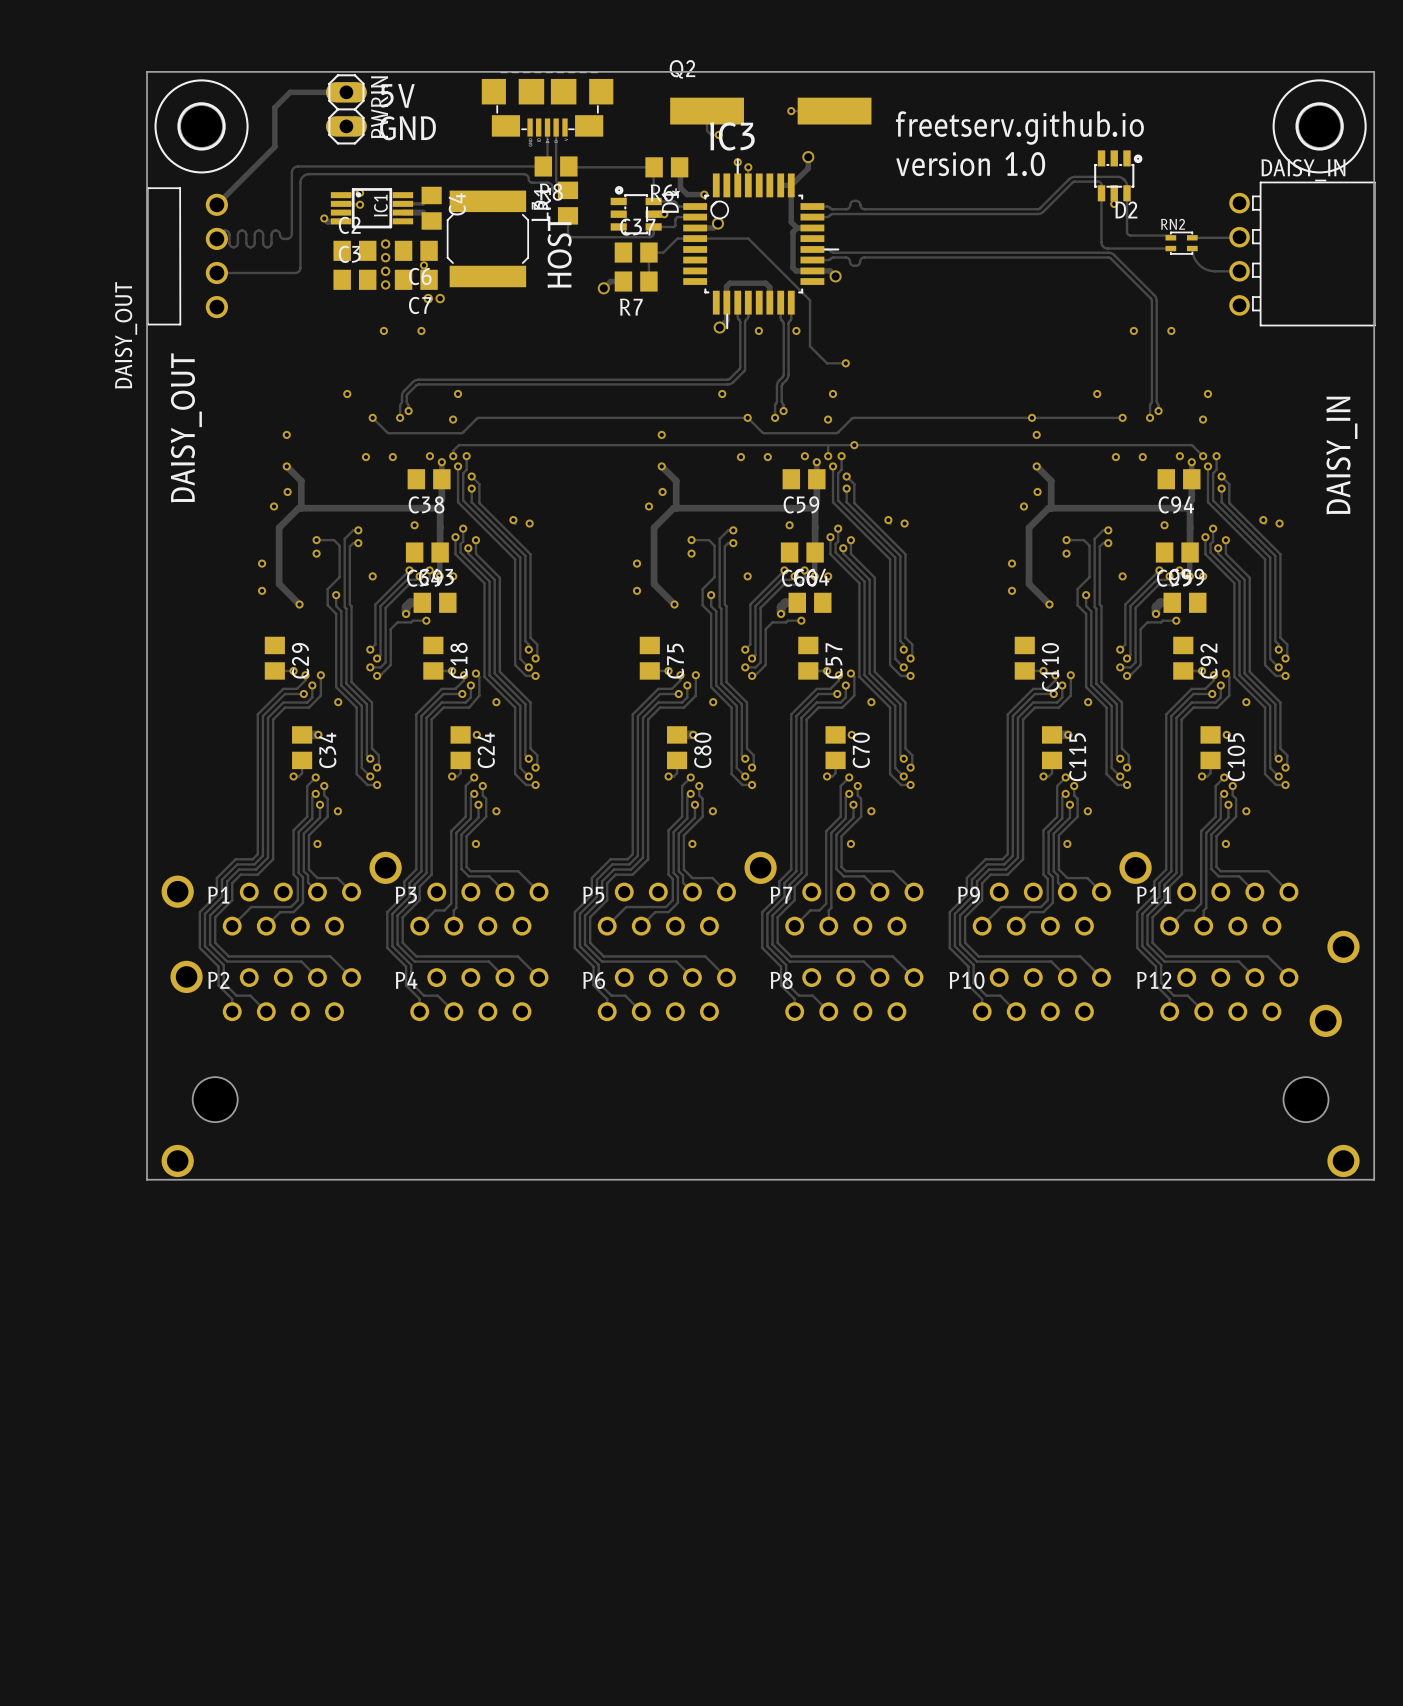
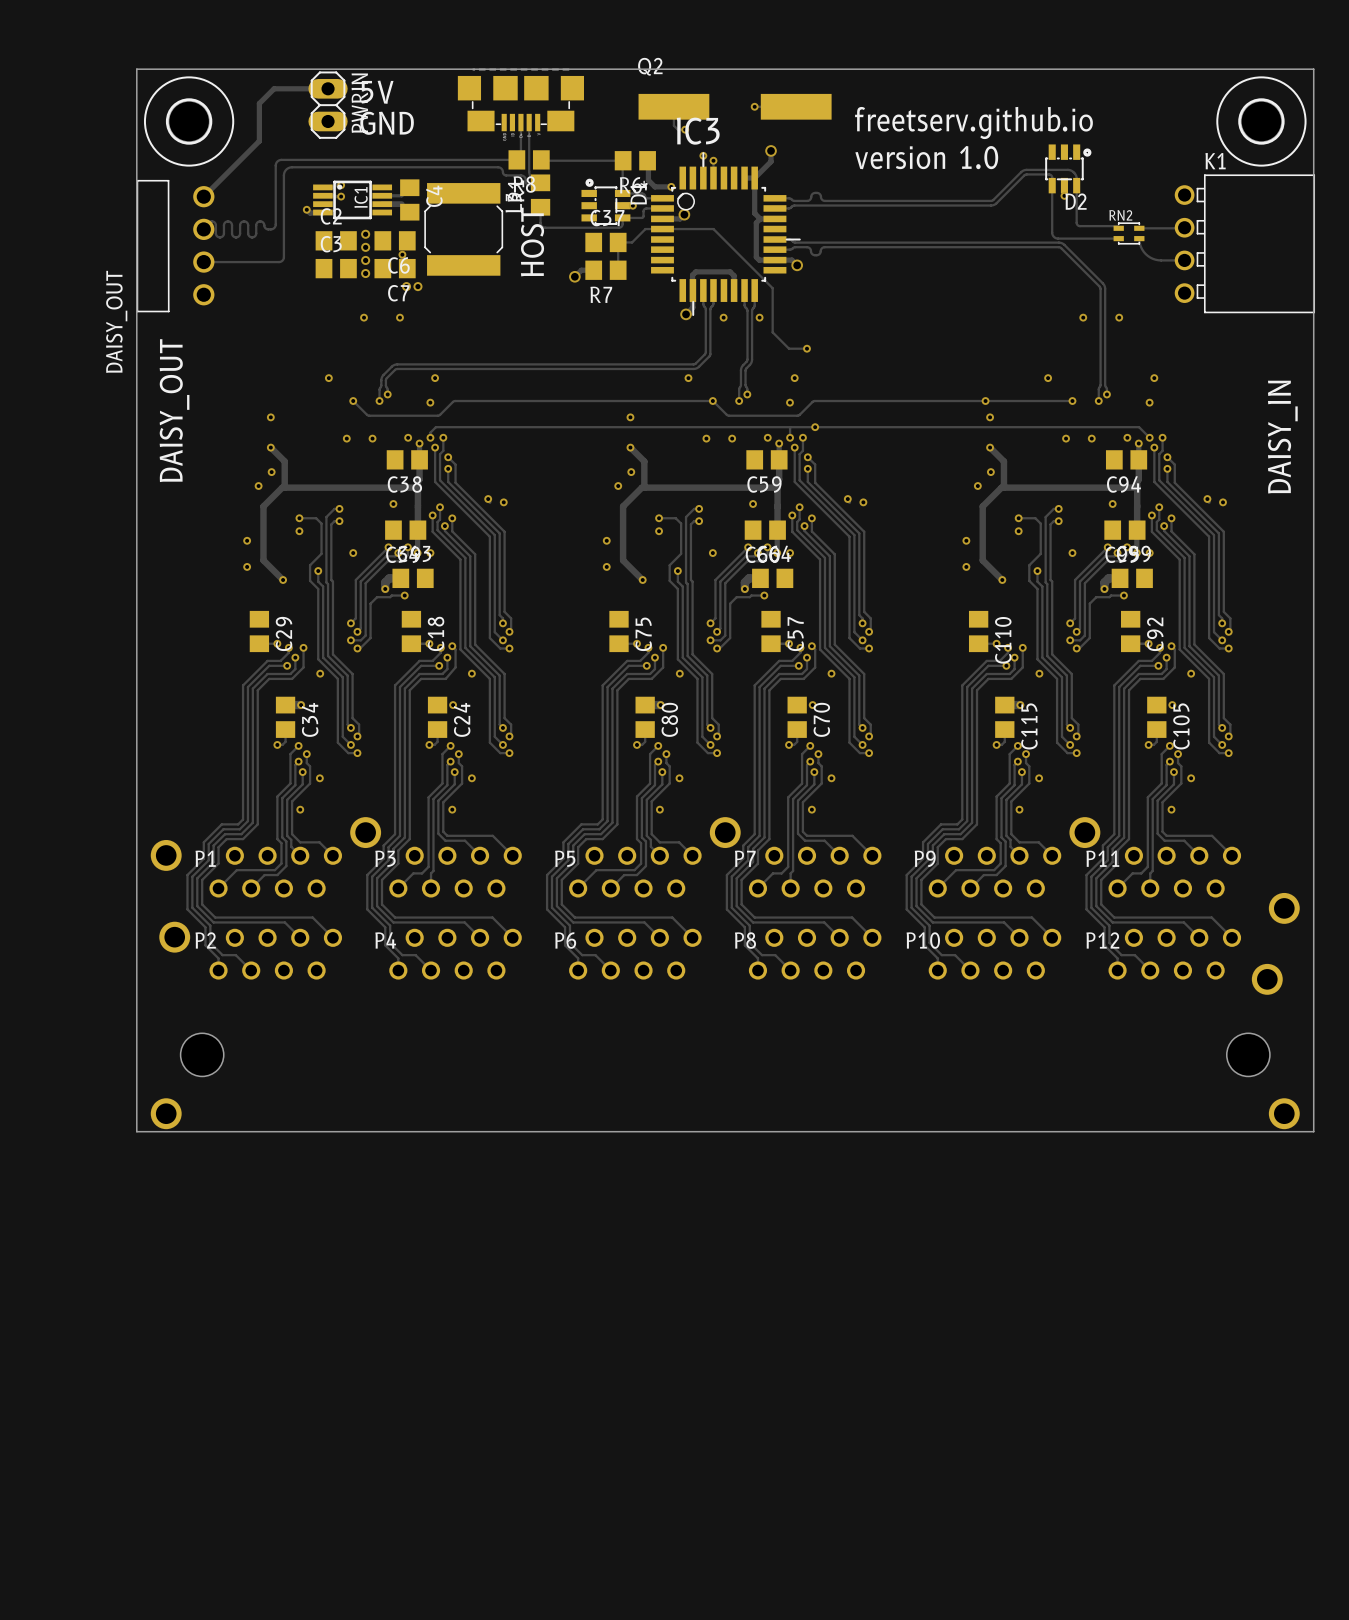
DAISY_IN name: DAISY_IN (1303, 170) -> K1 (1215, 161)

